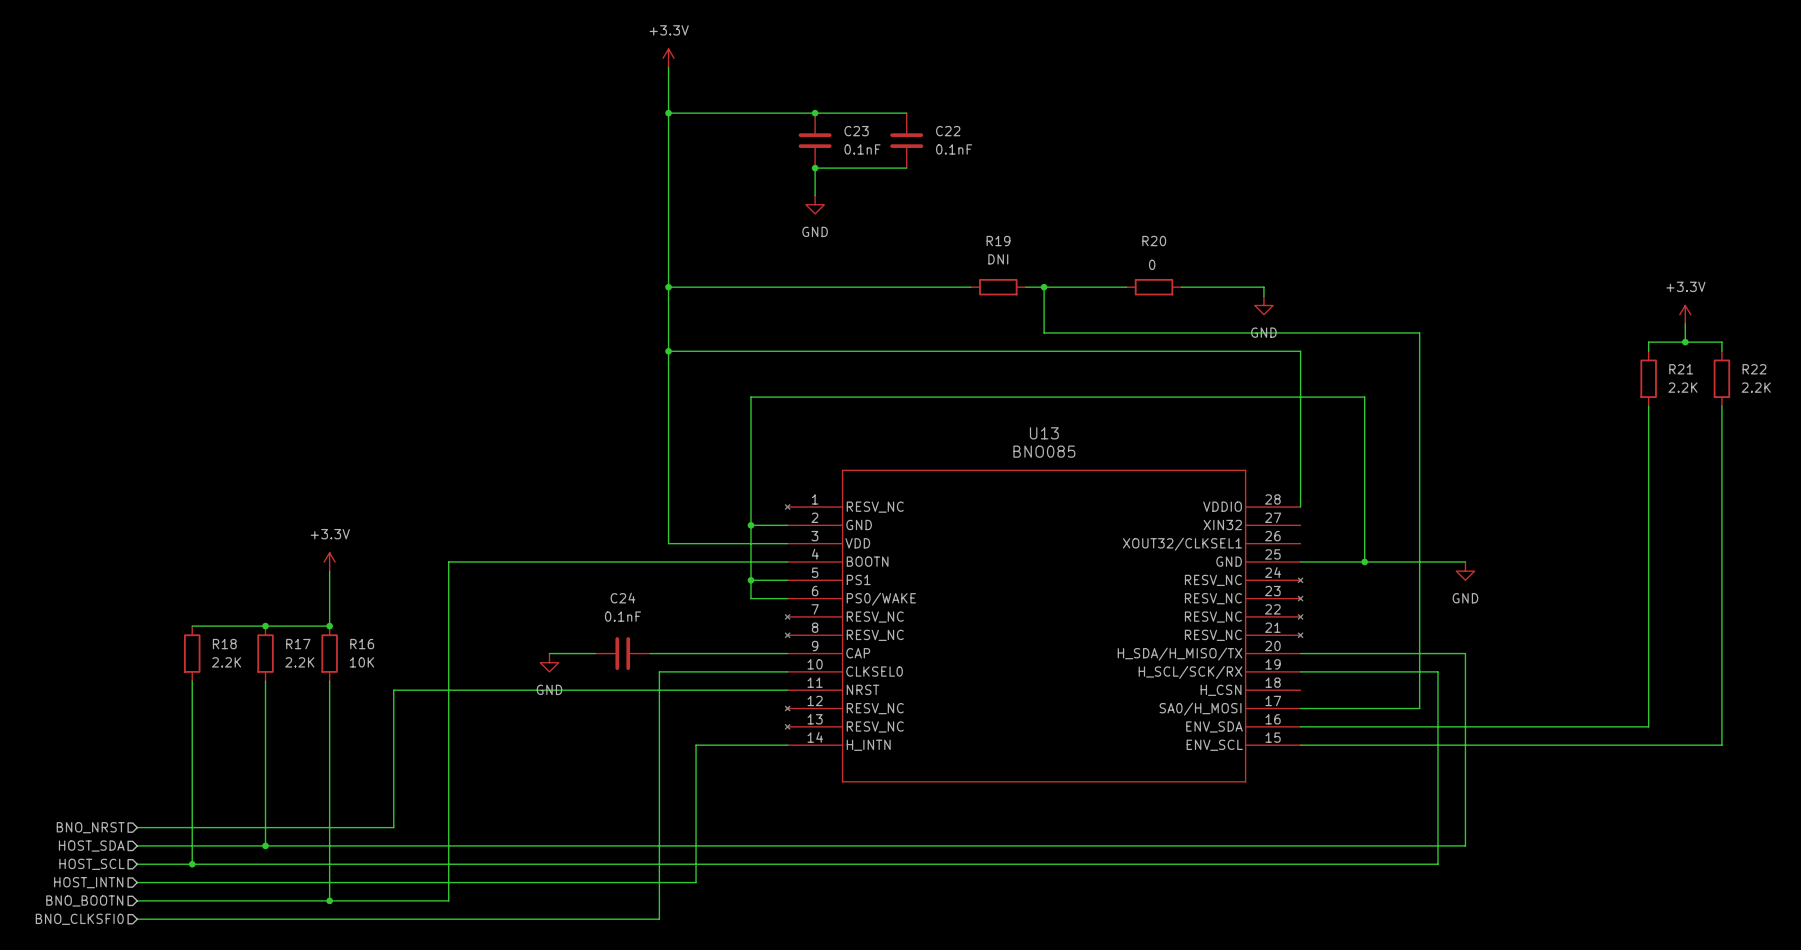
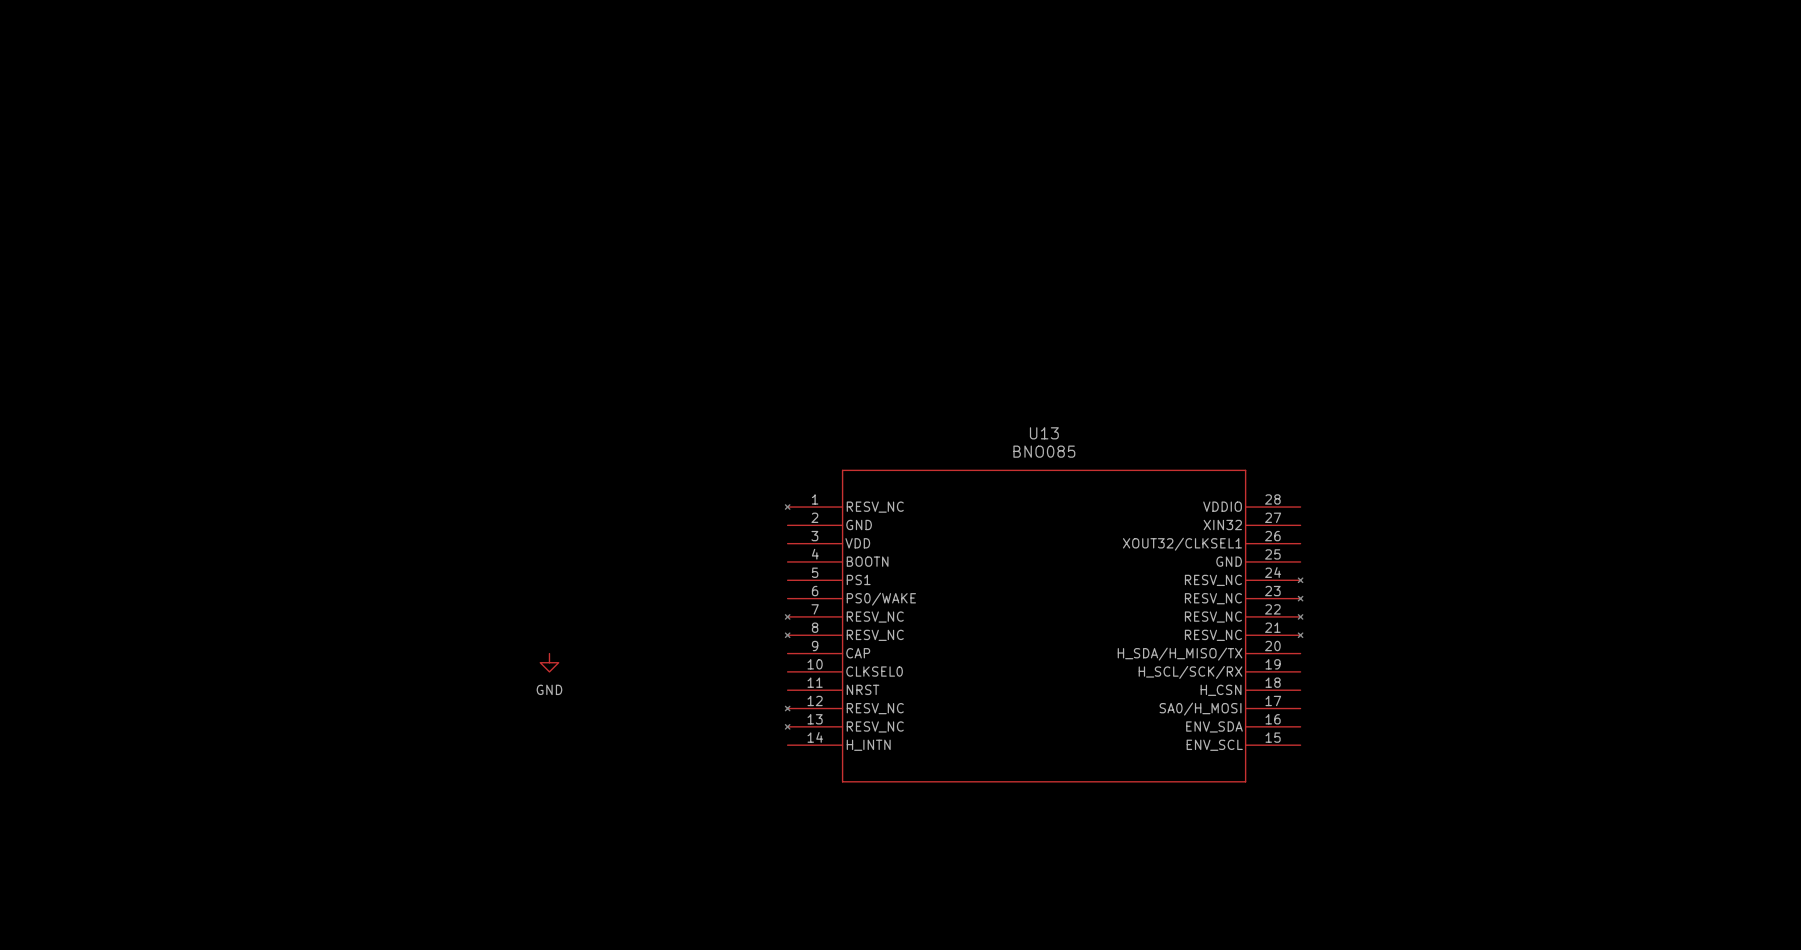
power symbol: +3.3V (668, 58) -> none
wire: (668, 67) (668, 543) (787, 543) -> none
wire: (668, 113) (906, 113) -> none
junction: (668, 113) -> none
junction: (815, 113) -> none
C23: 0.1nF (815, 140) -> none
C22: 0.1nF (906, 140) -> none
junction: (815, 168) -> none
wire: (906, 168) (815, 168) (815, 195) -> none
power symbol: GND (815, 204) -> none
wire: (668, 287) (970, 287) -> none
junction: (668, 287) -> none
R19: DNI (998, 287) -> none
wire: (1025, 287) (1126, 287) -> none
wire: (1044, 287) (1044, 332) (1419, 332) (1419, 708) (1300, 708) -> none
junction: (1044, 287) -> none
R20: 0 (1154, 287) -> none
wire: (1181, 287) (1263, 287) (1263, 296) -> none
power symbol: GND (1263, 305) -> none
power symbol: +3.3V (1685, 314) -> none
wire: (1685, 323) (1685, 342) -> none
junction: (1685, 342) -> none
wire: (668, 351) (1300, 351) (1300, 507) -> none
junction: (668, 351) -> none
wire: (1648, 351) (1648, 342) (1721, 342) (1721, 351) -> none
R21: 2.2K (1648, 378) -> none
R22: 2.2K (1721, 378) -> none
wire: (1648, 406) (1648, 726) (1300, 726) -> none
wire: (1721, 406) (1721, 745) (1300, 745) -> none
wire: (750, 525) (787, 525) -> none
junction: (750, 525) -> none
power symbol: +3.3V (329, 561) -> none
wire: (787, 561) (448, 561) (448, 900) (137, 900) -> none
wire: (1300, 561) (1465, 561) -> none
wire: (1364, 561) (1364, 397) (750, 397) (750, 598) (787, 598) -> none
junction: (1364, 561) -> none
wire: (329, 571) (329, 626) (192, 626) -> none
power symbol: GND (1465, 571) -> none
wire: (750, 580) (787, 580) -> none
junction: (750, 580) -> none
junction: (265, 626) -> none
junction: (329, 626) -> none
R18: 2.2K (192, 653) -> none
R17: 2.2K (265, 653) -> none
R16: 10K (329, 653) -> none
wire: (549, 653) (595, 653) -> none
C24: 0.1nF (622, 653) -> none
wire: (650, 653) (787, 653) -> none
wire: (1300, 653) (1465, 653) (1465, 845) (137, 845) -> none
wire: (787, 671) (659, 671) (659, 919) (137, 919) -> none
wire: (1300, 671) (1437, 671) (1437, 864) (137, 864) -> none
wire: (192, 681) (192, 864) -> none
wire: (265, 681) (265, 845) -> none
wire: (329, 681) (329, 900) -> none
wire: (787, 690) (393, 690) (393, 827) (137, 827) -> none
wire: (787, 745) (696, 745) (696, 882) (137, 882) -> none
hierarchical label: BNO_NRST (90, 827) -> none
junction: (265, 845) -> none
hierarchical label: HOST_SDA (91, 846) -> none
hierarchical label: HOST_SCL (91, 864) -> none
junction: (192, 864) -> none
hierarchical label: HOST_INTN (88, 882) -> none
hierarchical label: BNO_BOOTN (84, 900) -> none
junction: (329, 900) -> none
hierarchical label: BNO_CLKSFI0 (79, 919) -> none

